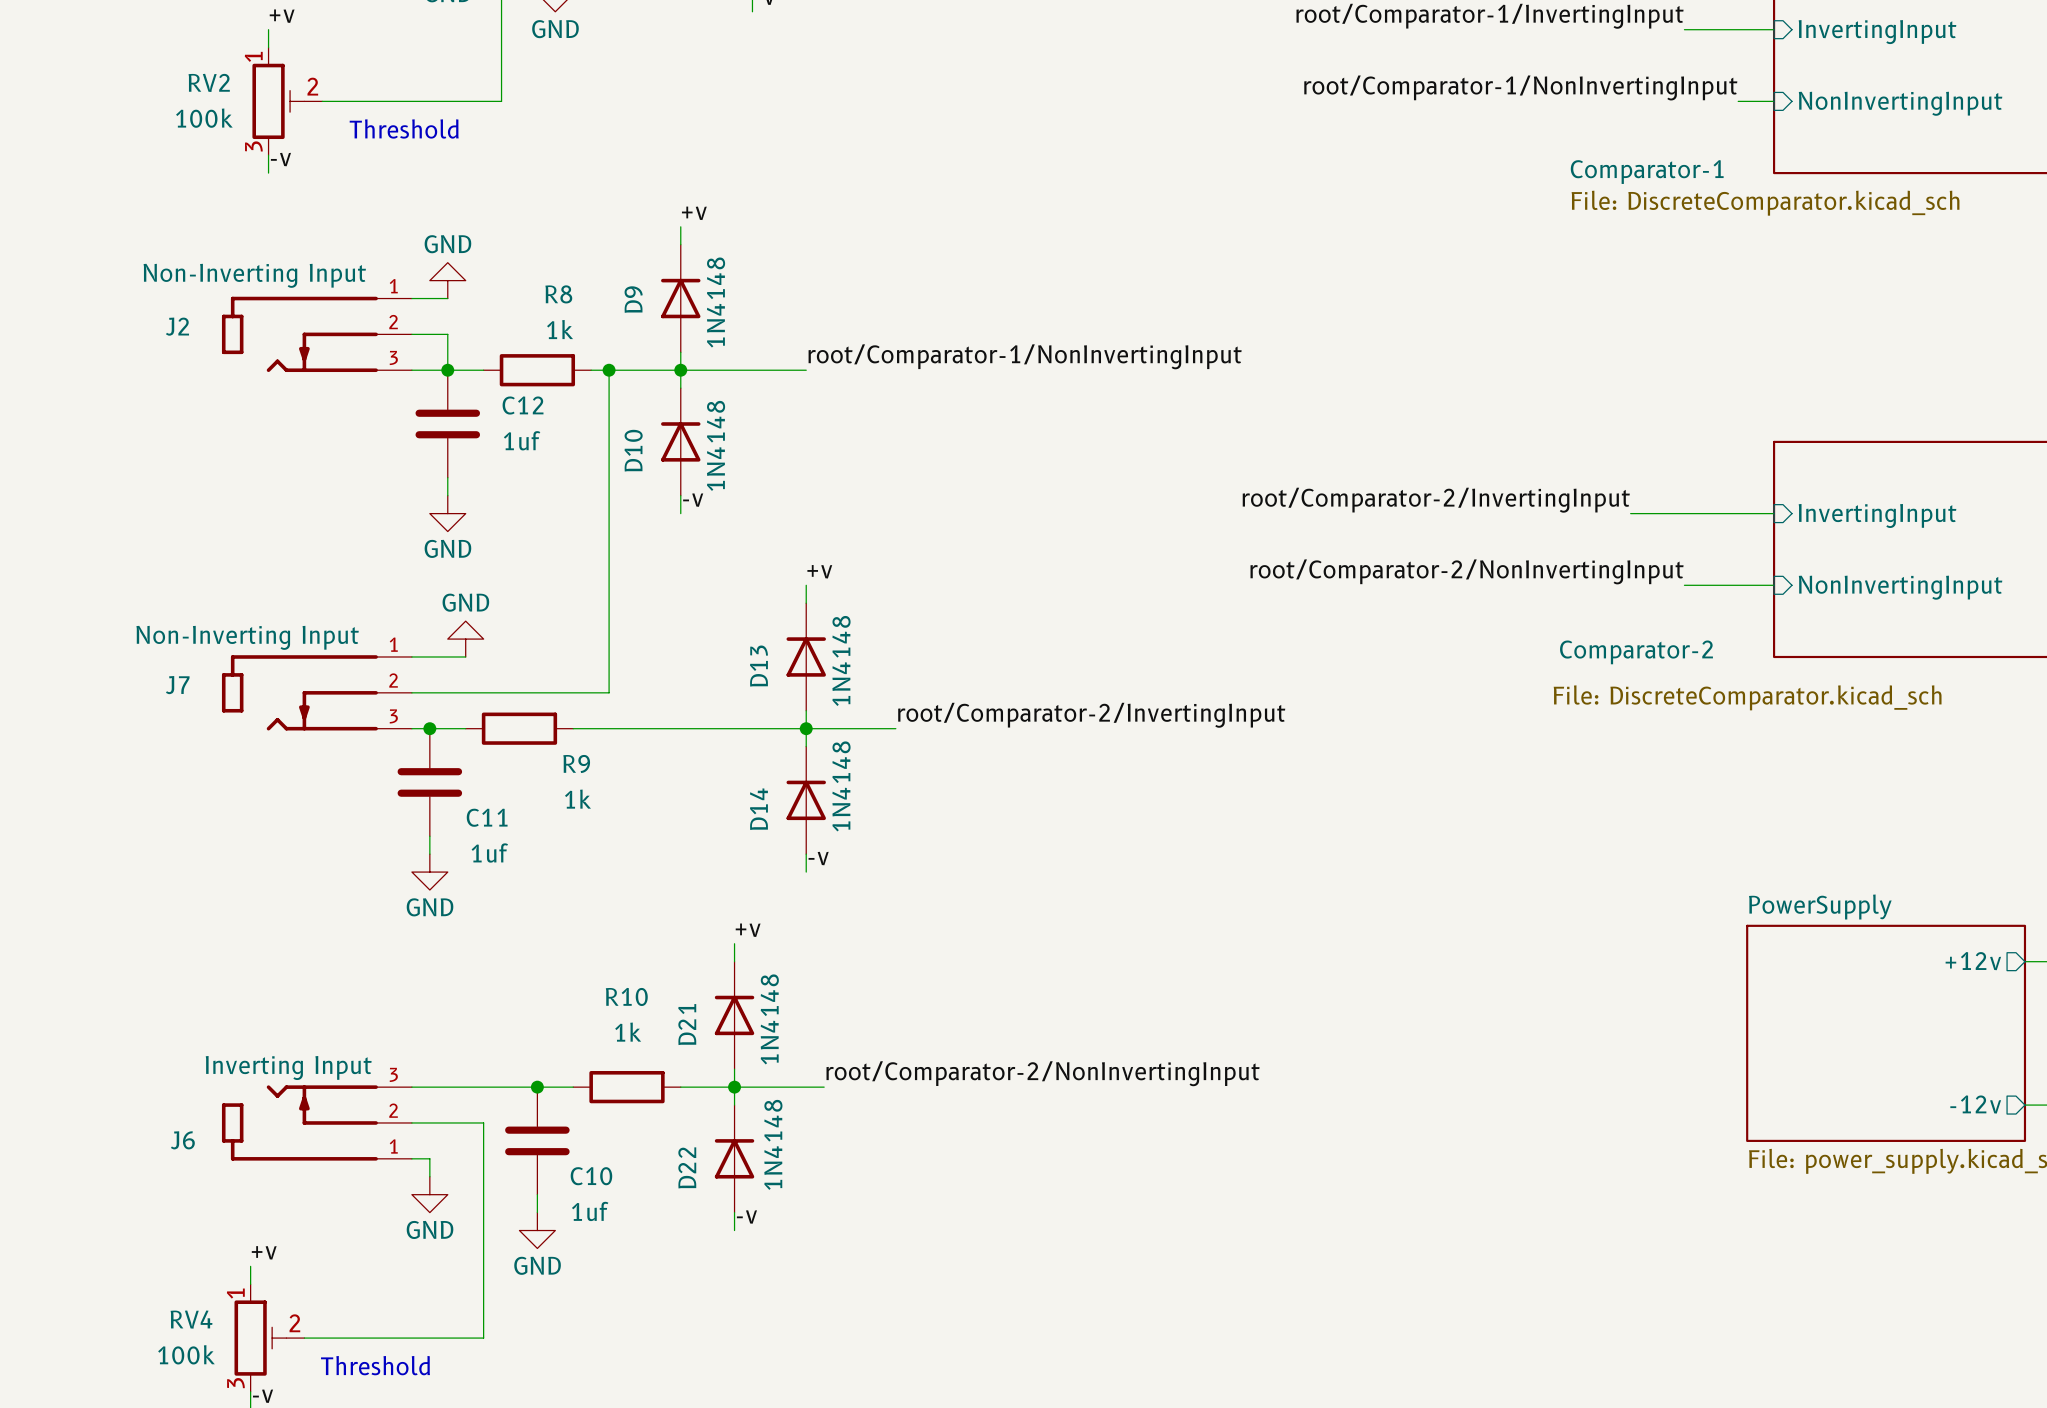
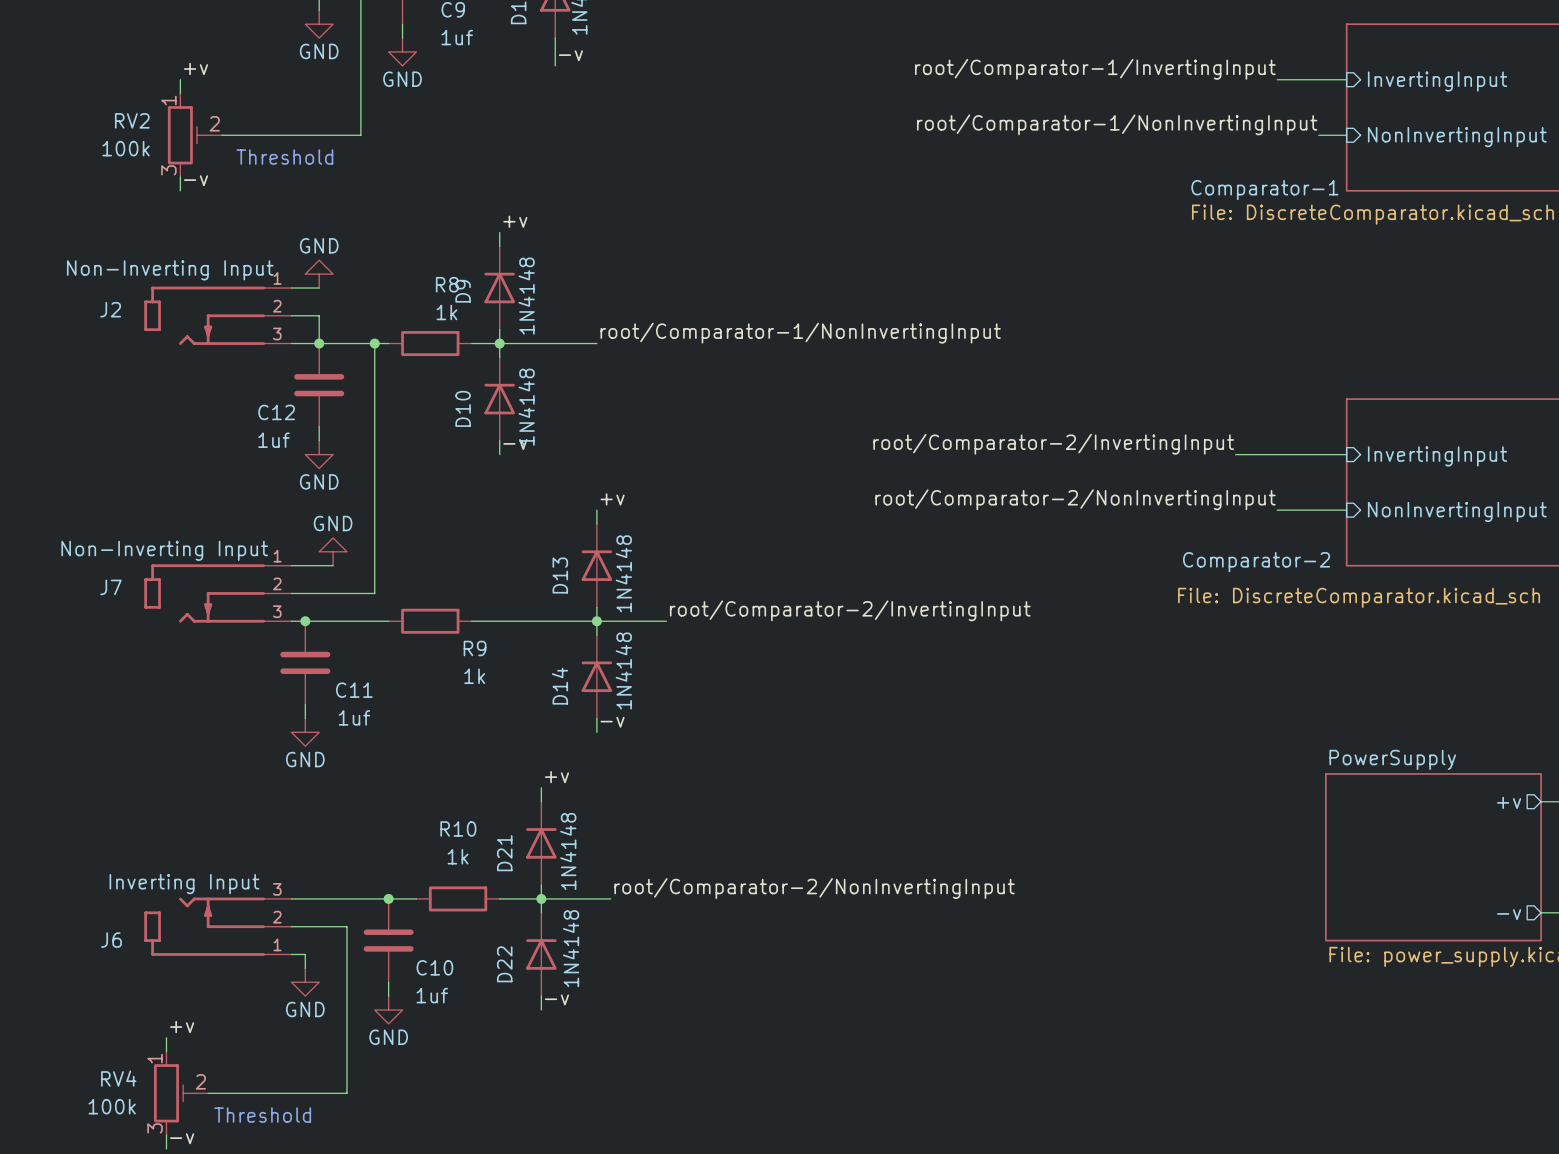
junction: none -> (374, 343)
R8 position: (537, 370) -> (430, 343)
wire: (591, 370) (644, 370) -> (346, 343) (388, 343)
wire: (609, 370) (609, 692) (519, 692) -> (374, 343) (374, 593)
junction: (609, 370) -> none
C12 name position: C12 (523, 405) -> C12 (276, 412)
C12 value position: 1uf (522, 440) -> 1uf (273, 440)
R9 position: (519, 728) -> (430, 621)
wire: (573, 728) (644, 728) -> (333, 621) (388, 621)
sheet pin: +12v (1973, 961) -> +v (1509, 802)
sheet pin: -12v (1975, 1104) -> -v (1509, 914)

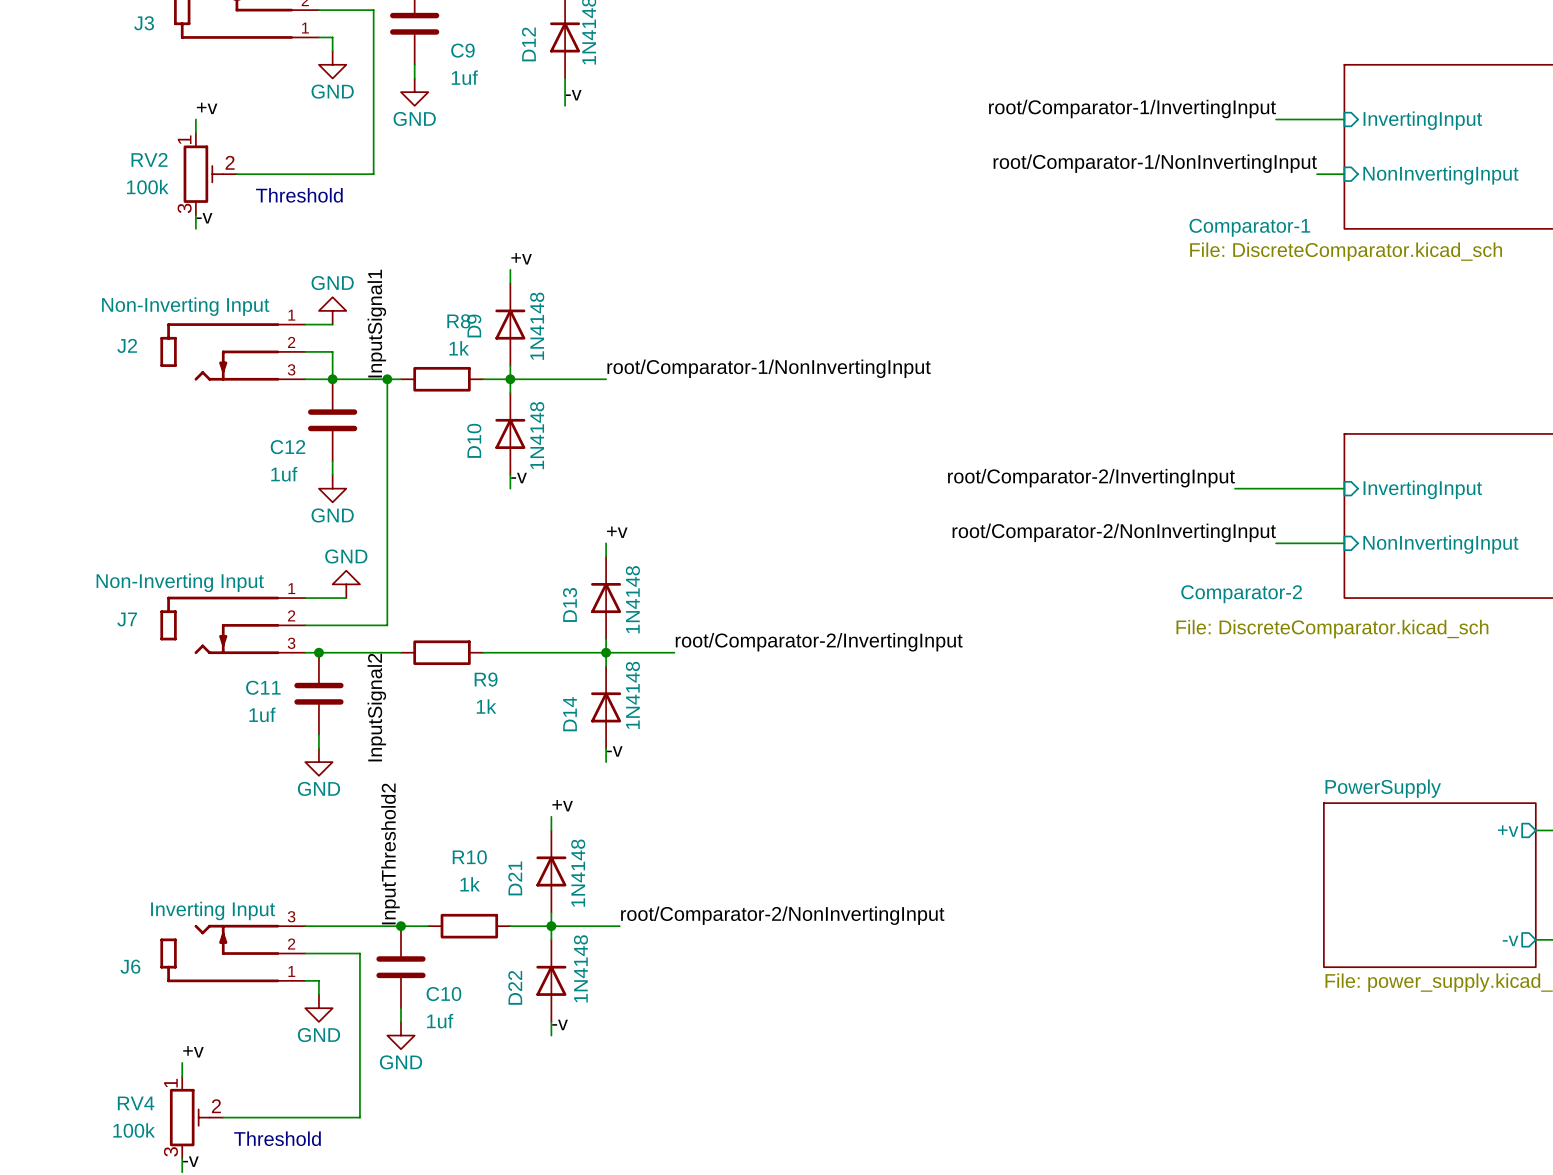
label: none -> InputSignal1 (376, 323)
label: none -> InputSignal2 (376, 707)
C11 name position: C11 (354, 690) -> C11 (263, 687)
C11 value position: 1uf (354, 717) -> 1uf (262, 714)
label: none -> InputThreshold2 (390, 853)

